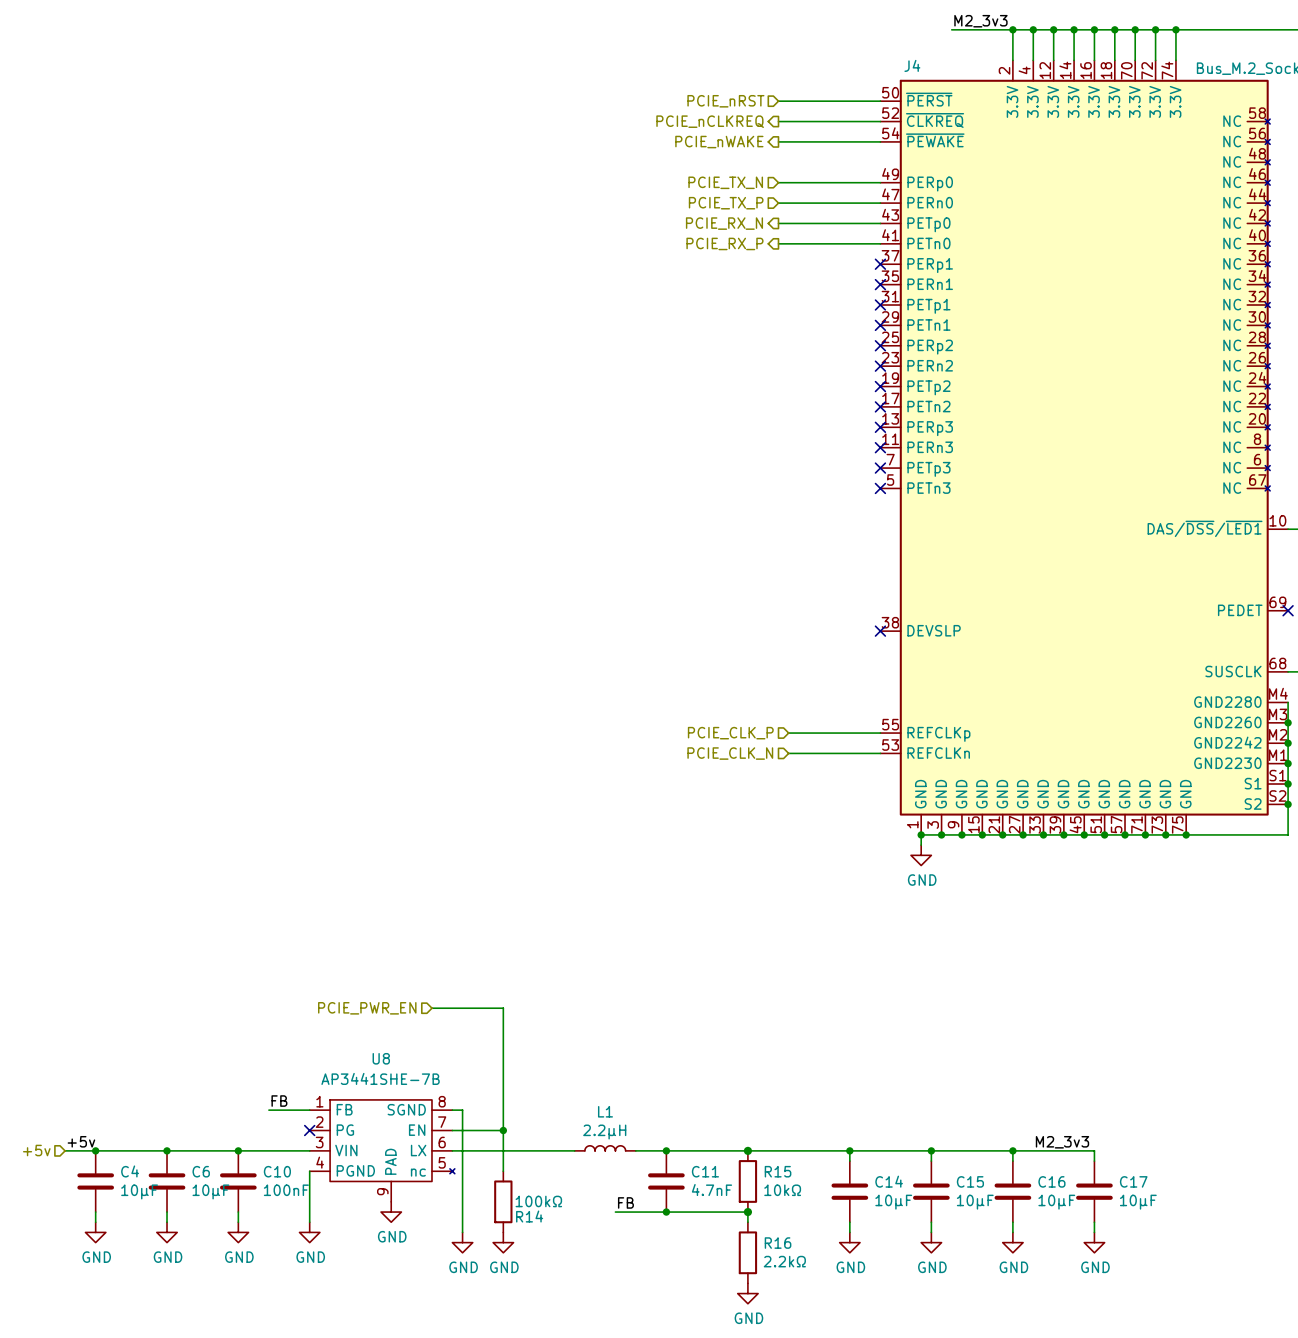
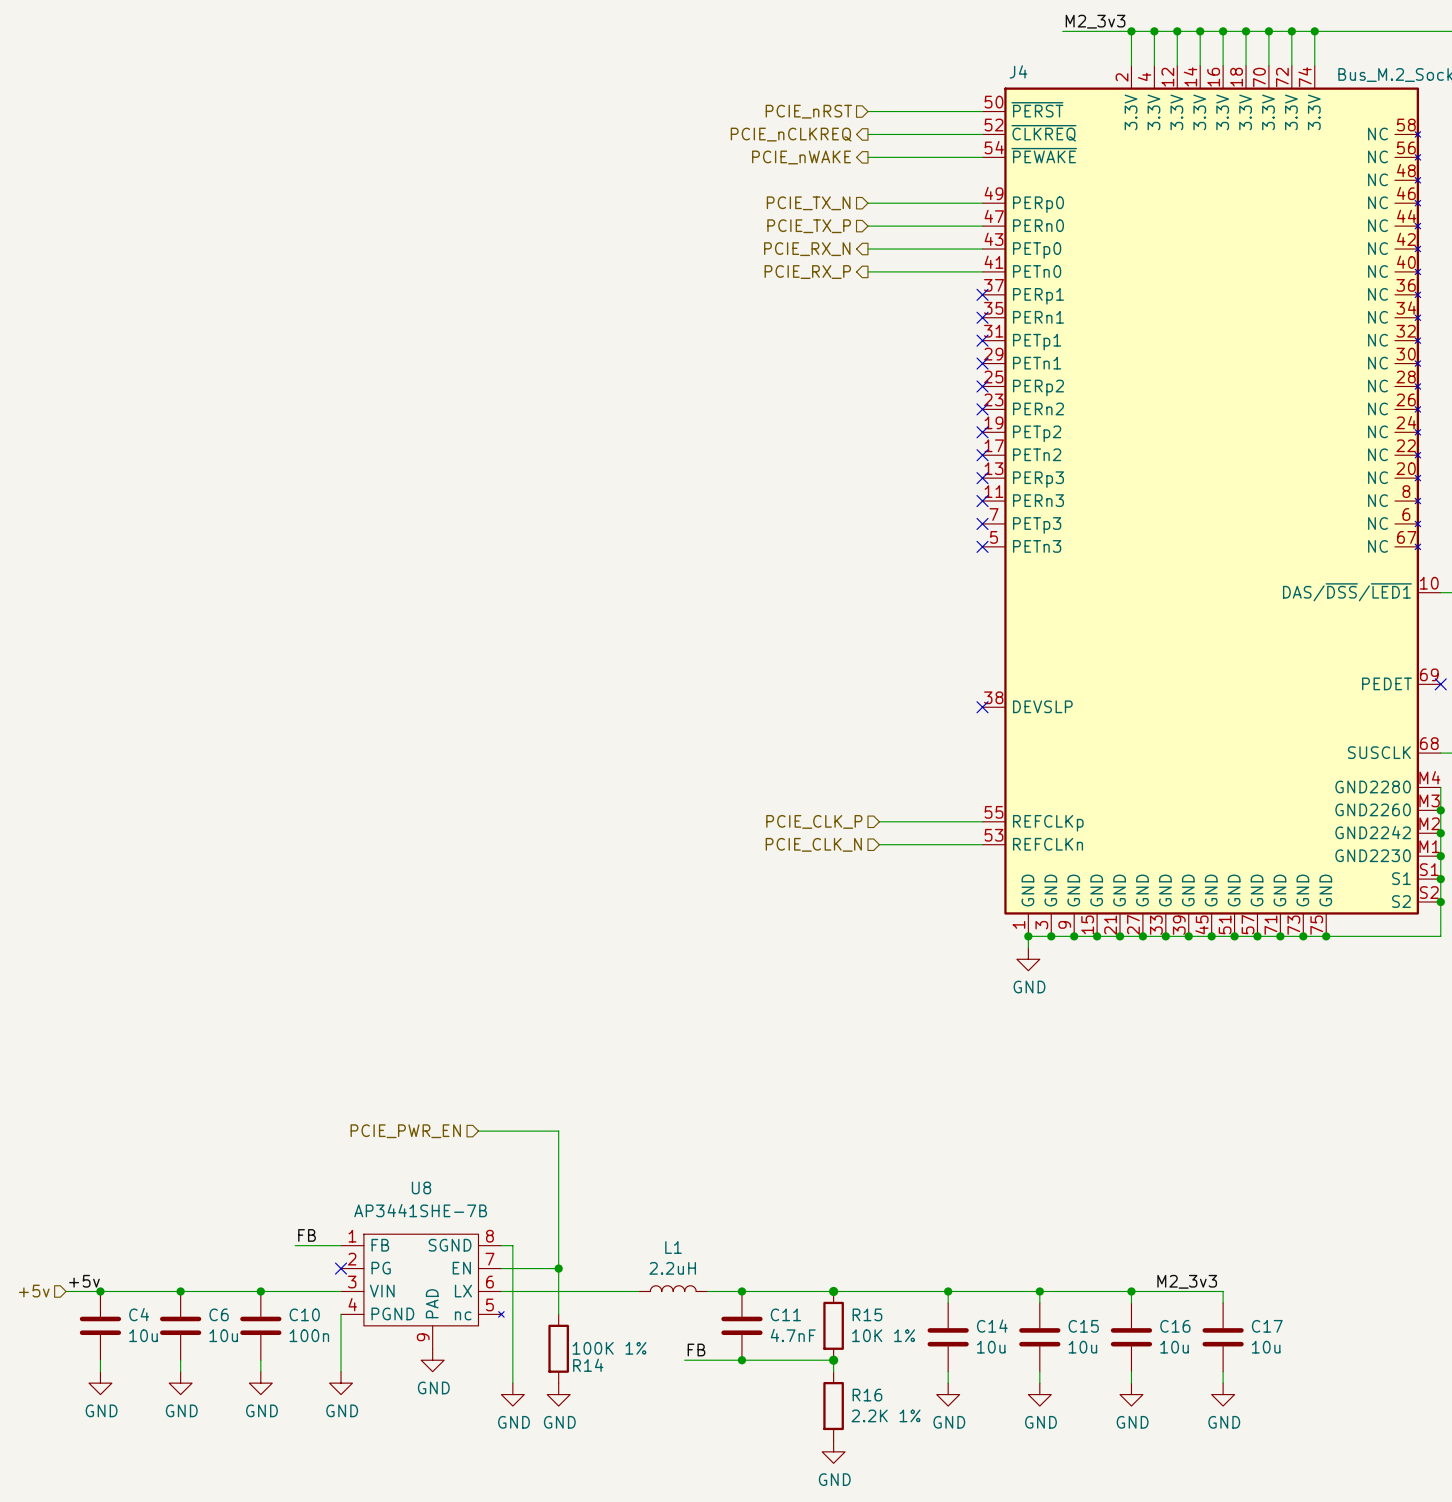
L1 value: 2.2µH (604, 1132) -> 2.2uH (672, 1268)
C10 value: 100nF (286, 1190) -> 100n (309, 1335)
R15 value: 10kΩ (782, 1190) -> 10K 1% (883, 1335)
C4 value: 10µF (139, 1191) -> 10u (143, 1335)
C6 value: 10µF (210, 1191) -> 10u (223, 1335)
R14 value: 100kΩ (538, 1201) -> 100K 1% (609, 1348)
C14 value: 10µF (893, 1202) -> 10u (991, 1347)
C15 value: 10µF (975, 1202) -> 10u (1082, 1347)
C16 value: 10µF (1056, 1202) -> 10u (1174, 1347)
C17 value: 10µF (1138, 1202) -> 10u (1266, 1347)
R16 value: 2.2kΩ (784, 1261) -> 2.2K 1% (886, 1415)

